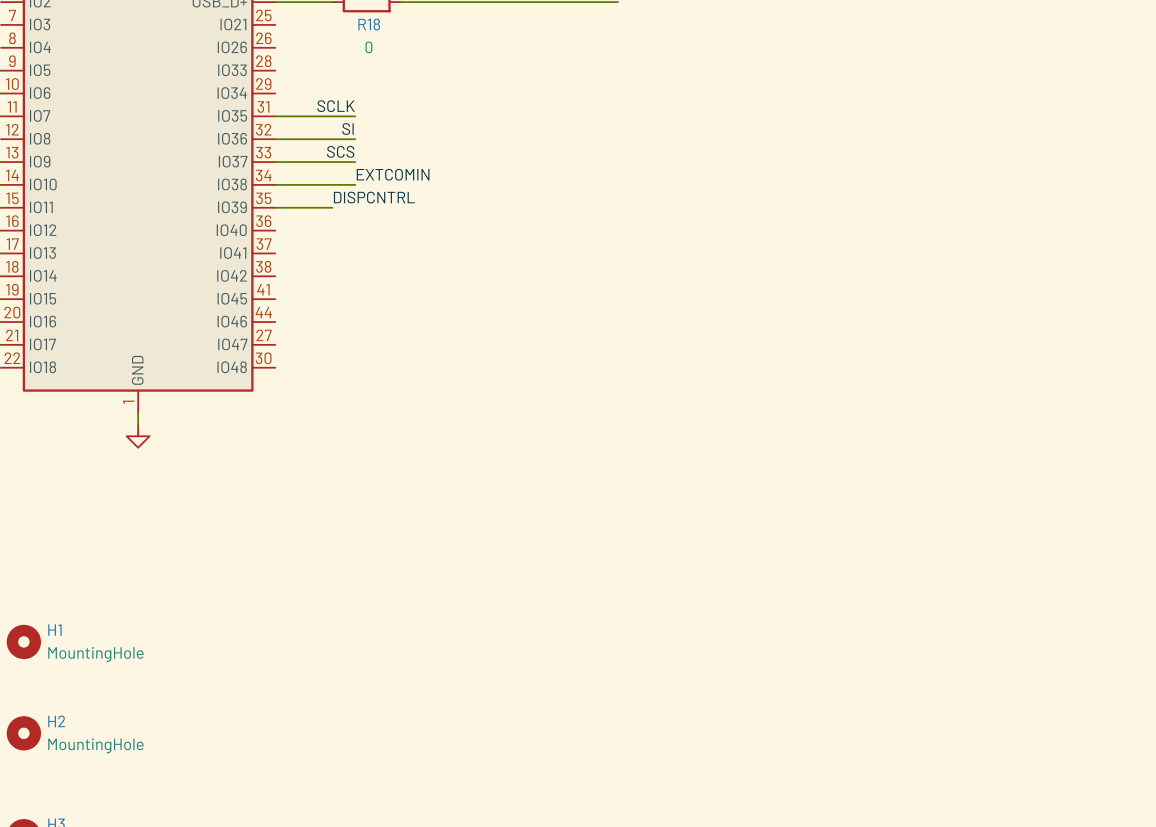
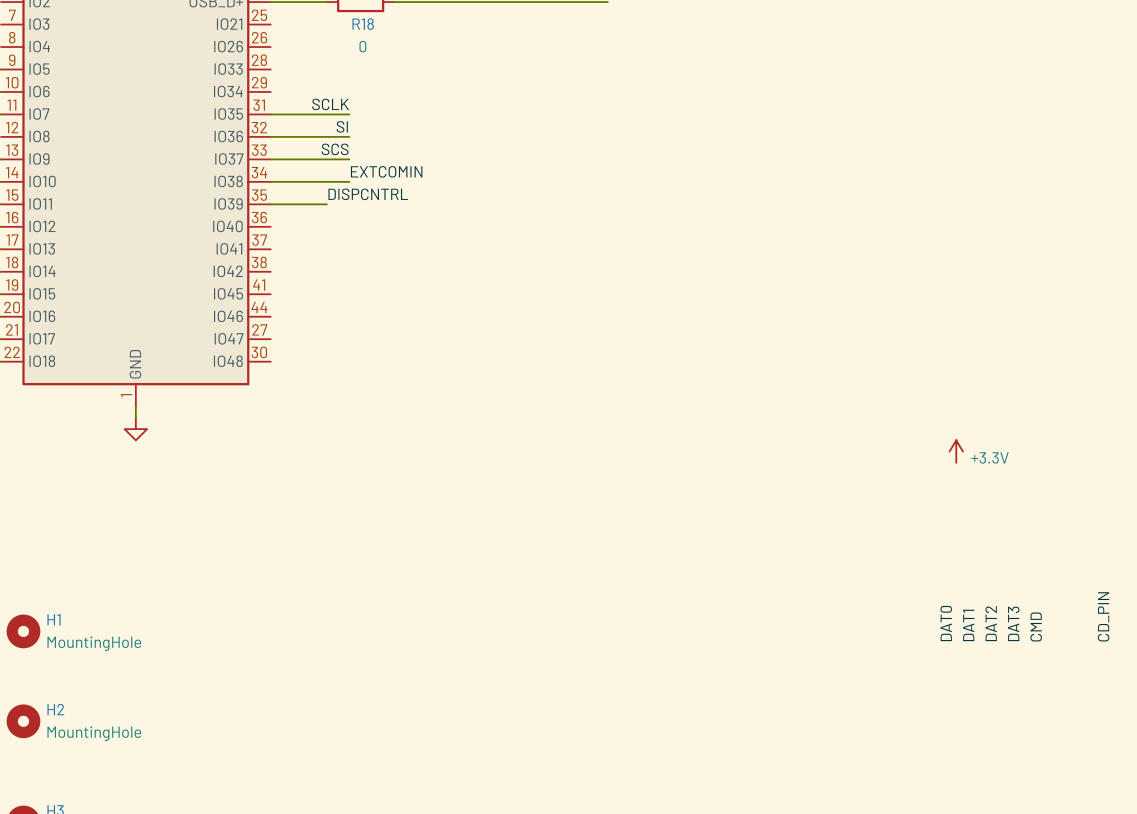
power symbol: none -> +3.3V (956, 451)
label: none -> CD_PIN (1103, 616)
label: none -> DAT0 (946, 623)
label: none -> DAT2 (991, 623)
label: none -> DAT3 (1013, 623)
label: none -> DAT1 (968, 625)
label: none -> CMD (1036, 626)

